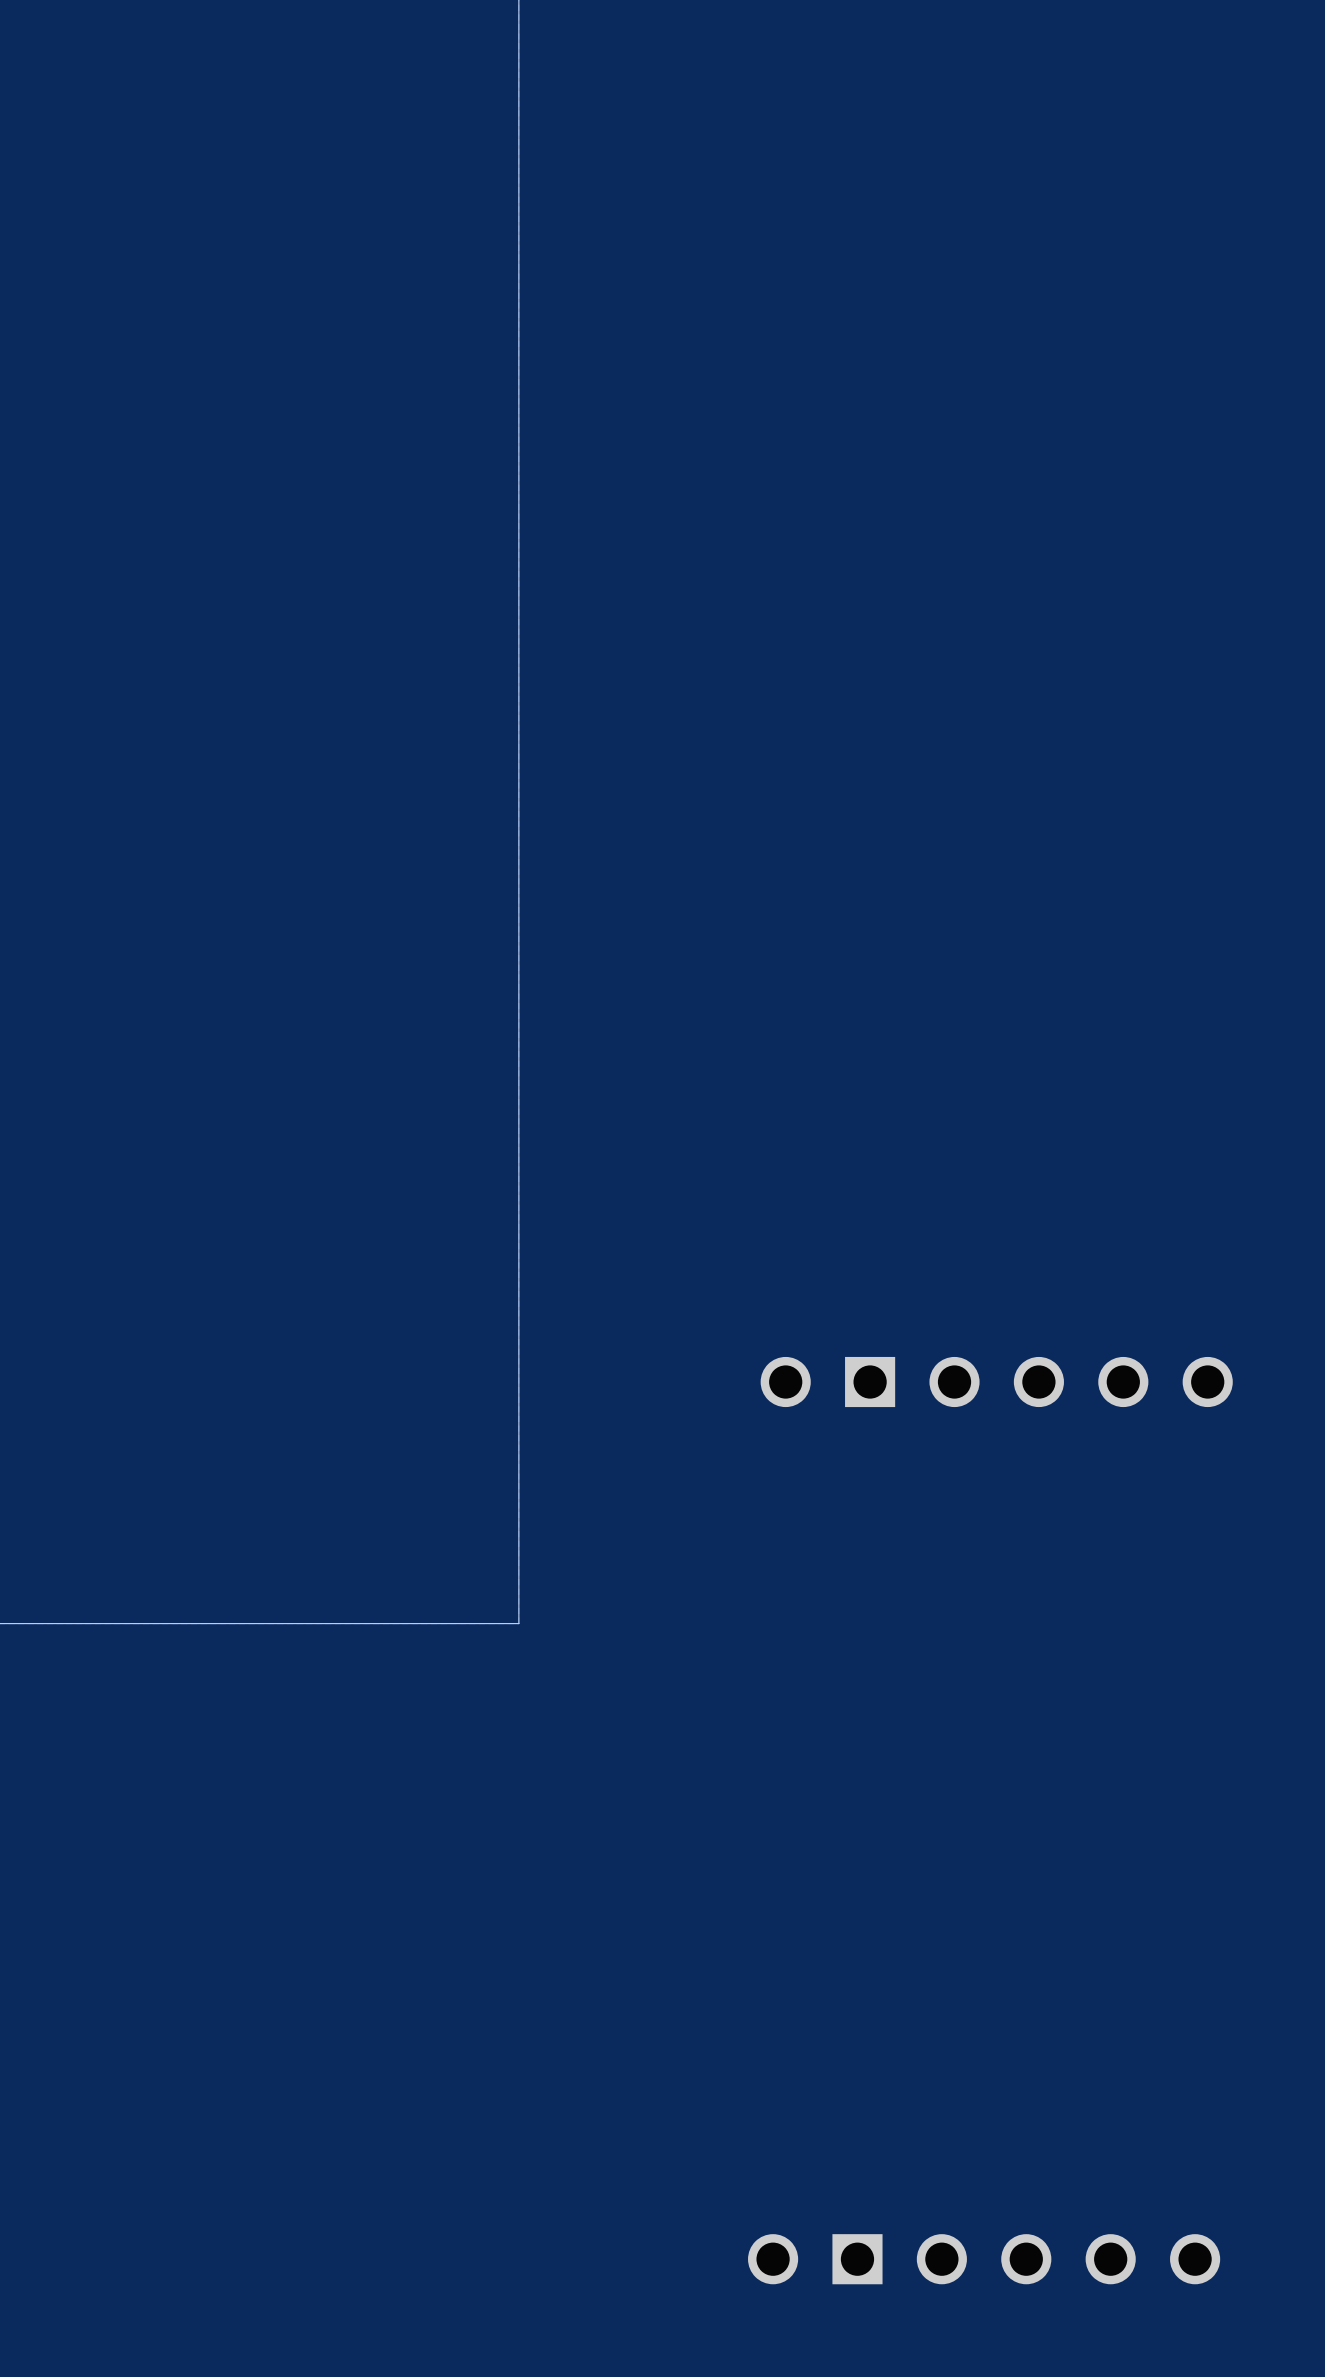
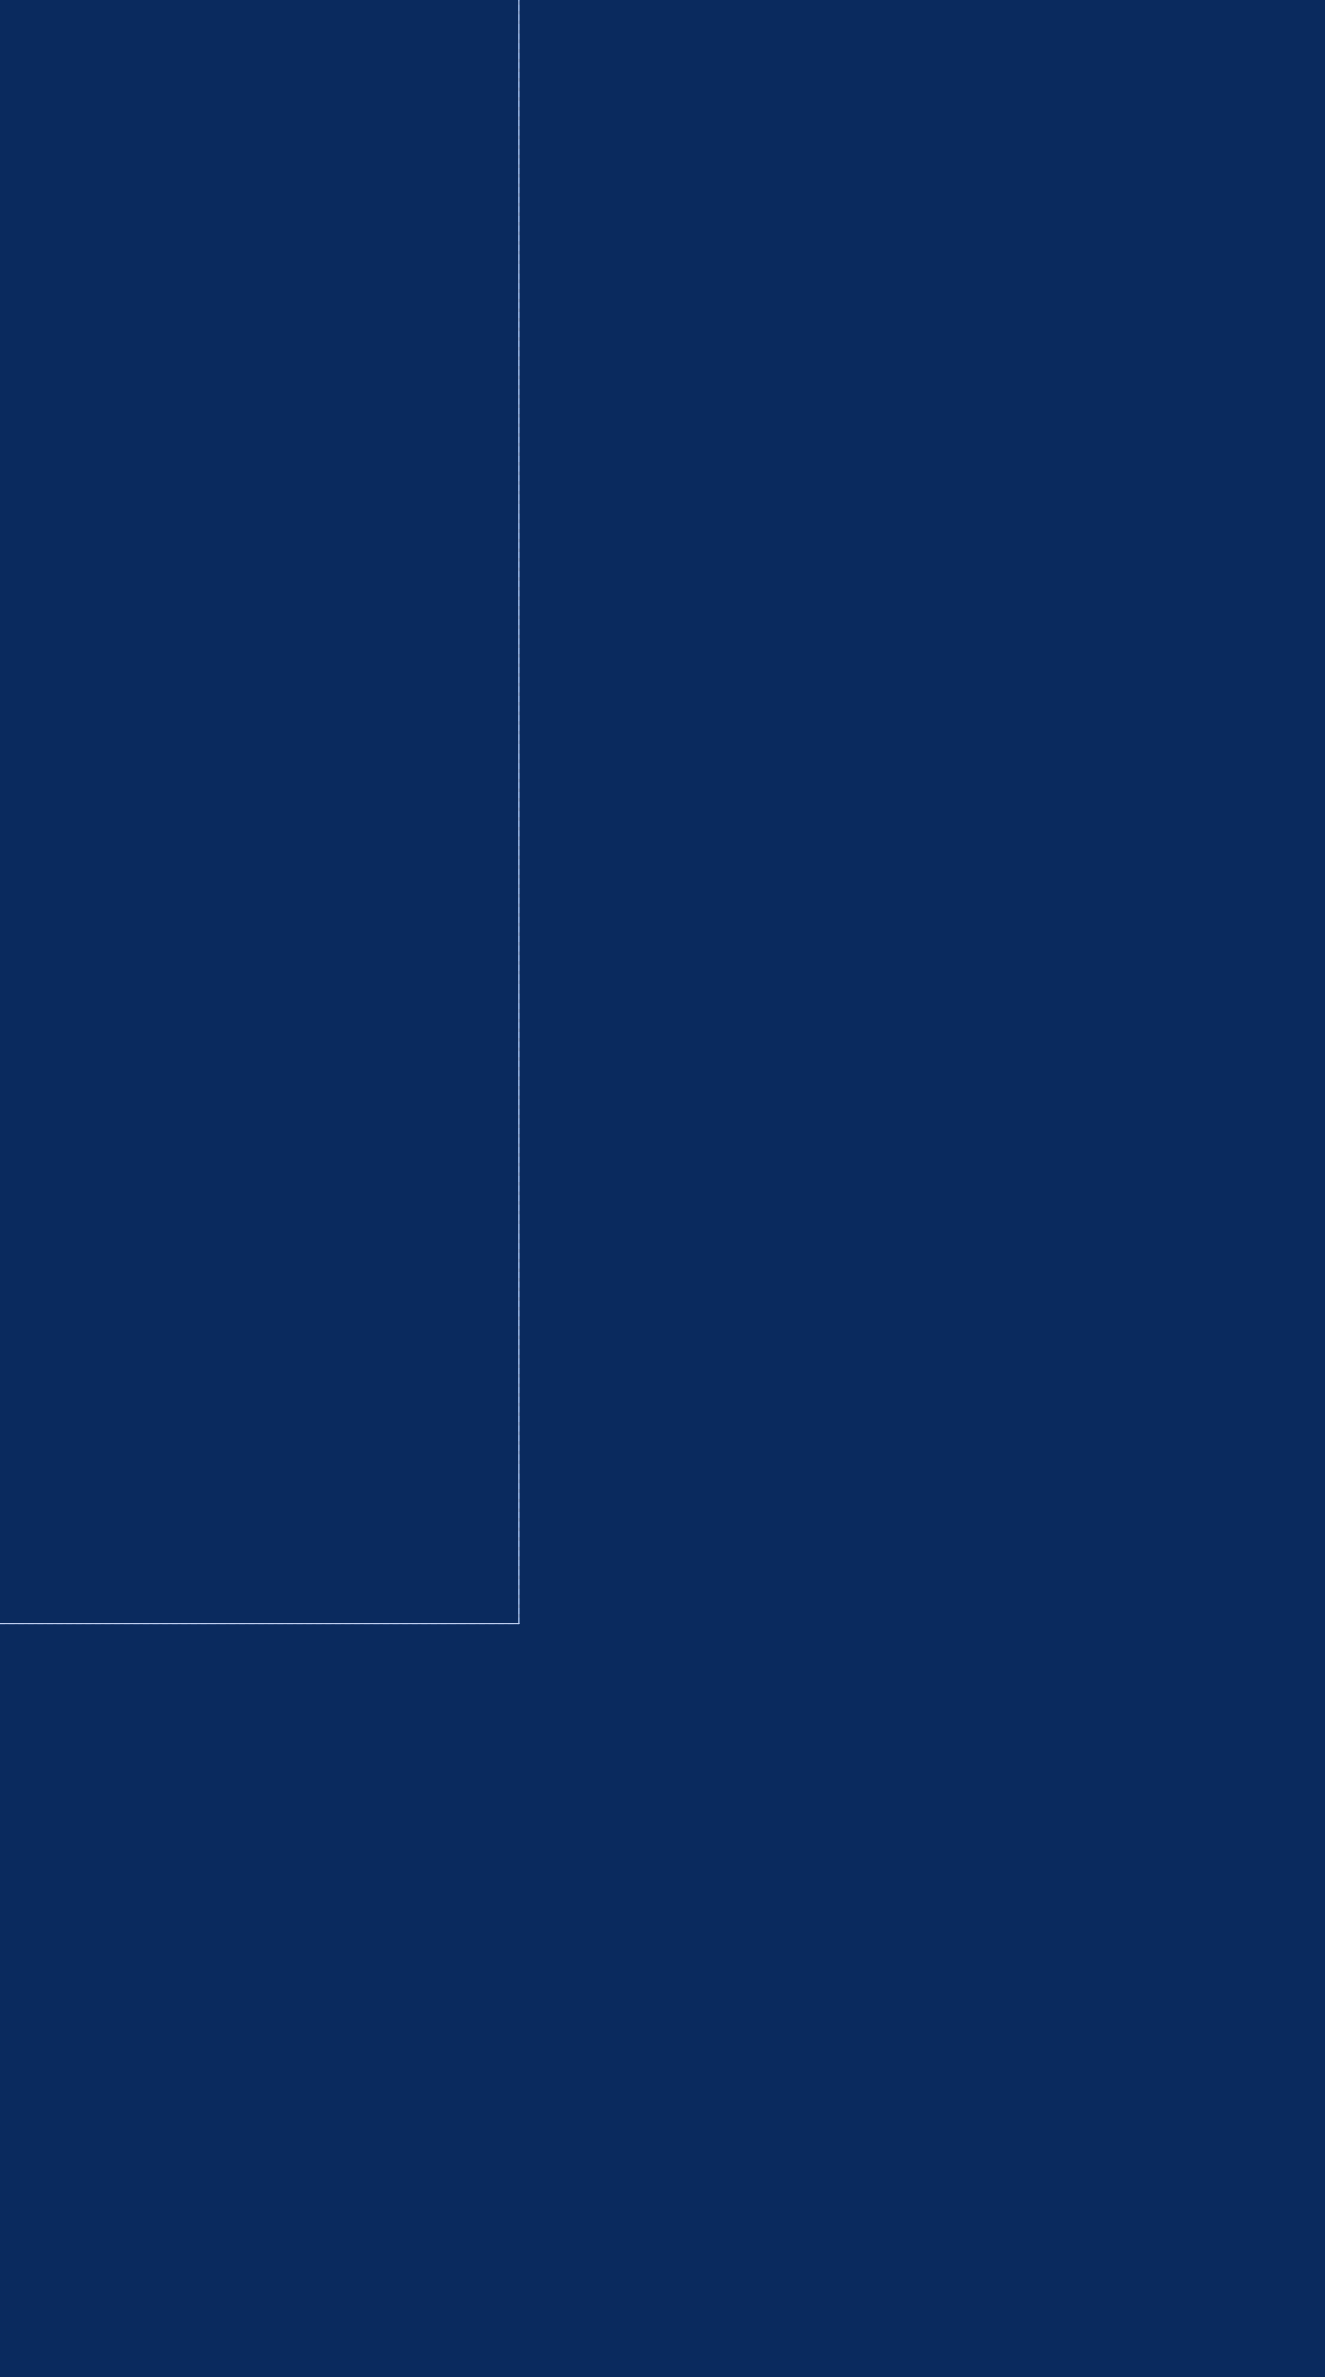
part: (996, 1382) -> none
part: (984, 2259) -> none

